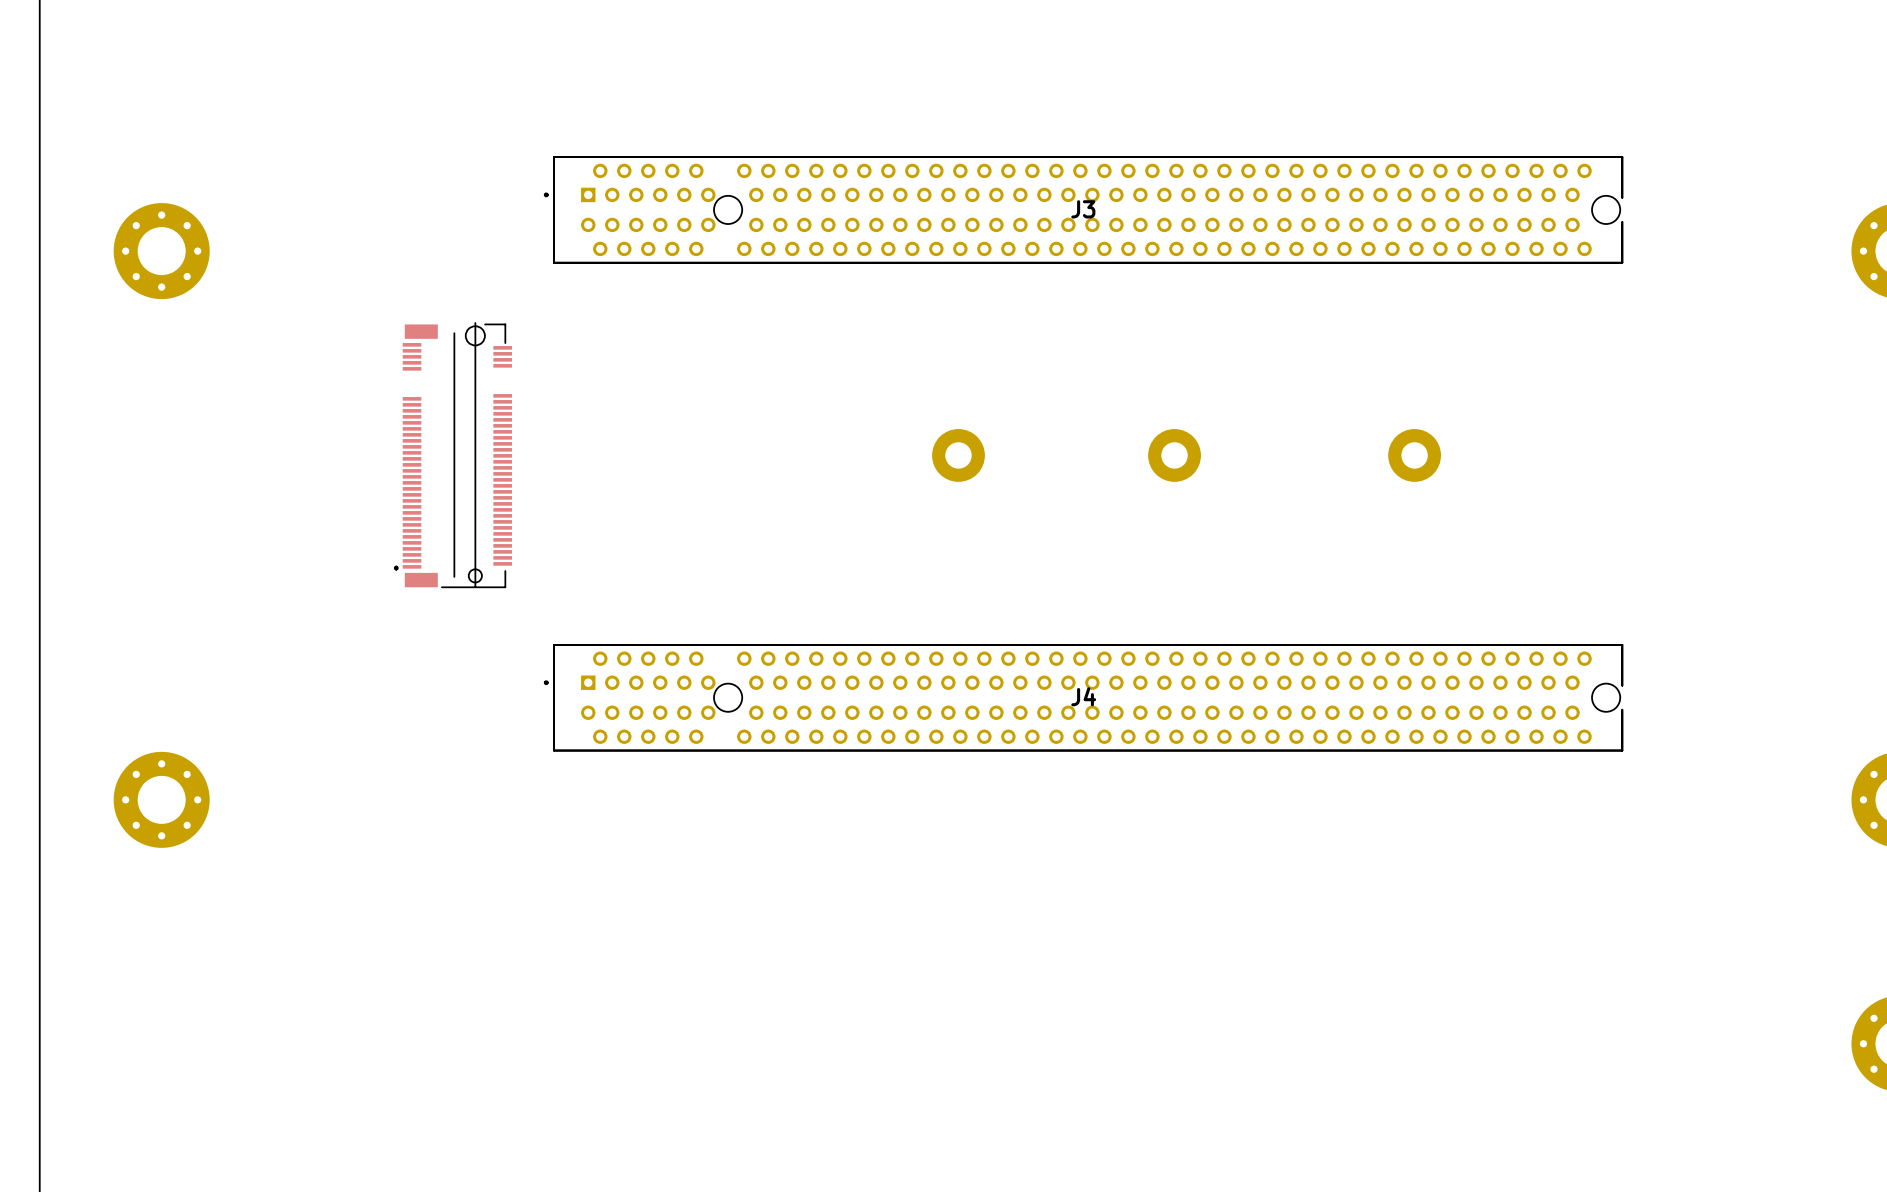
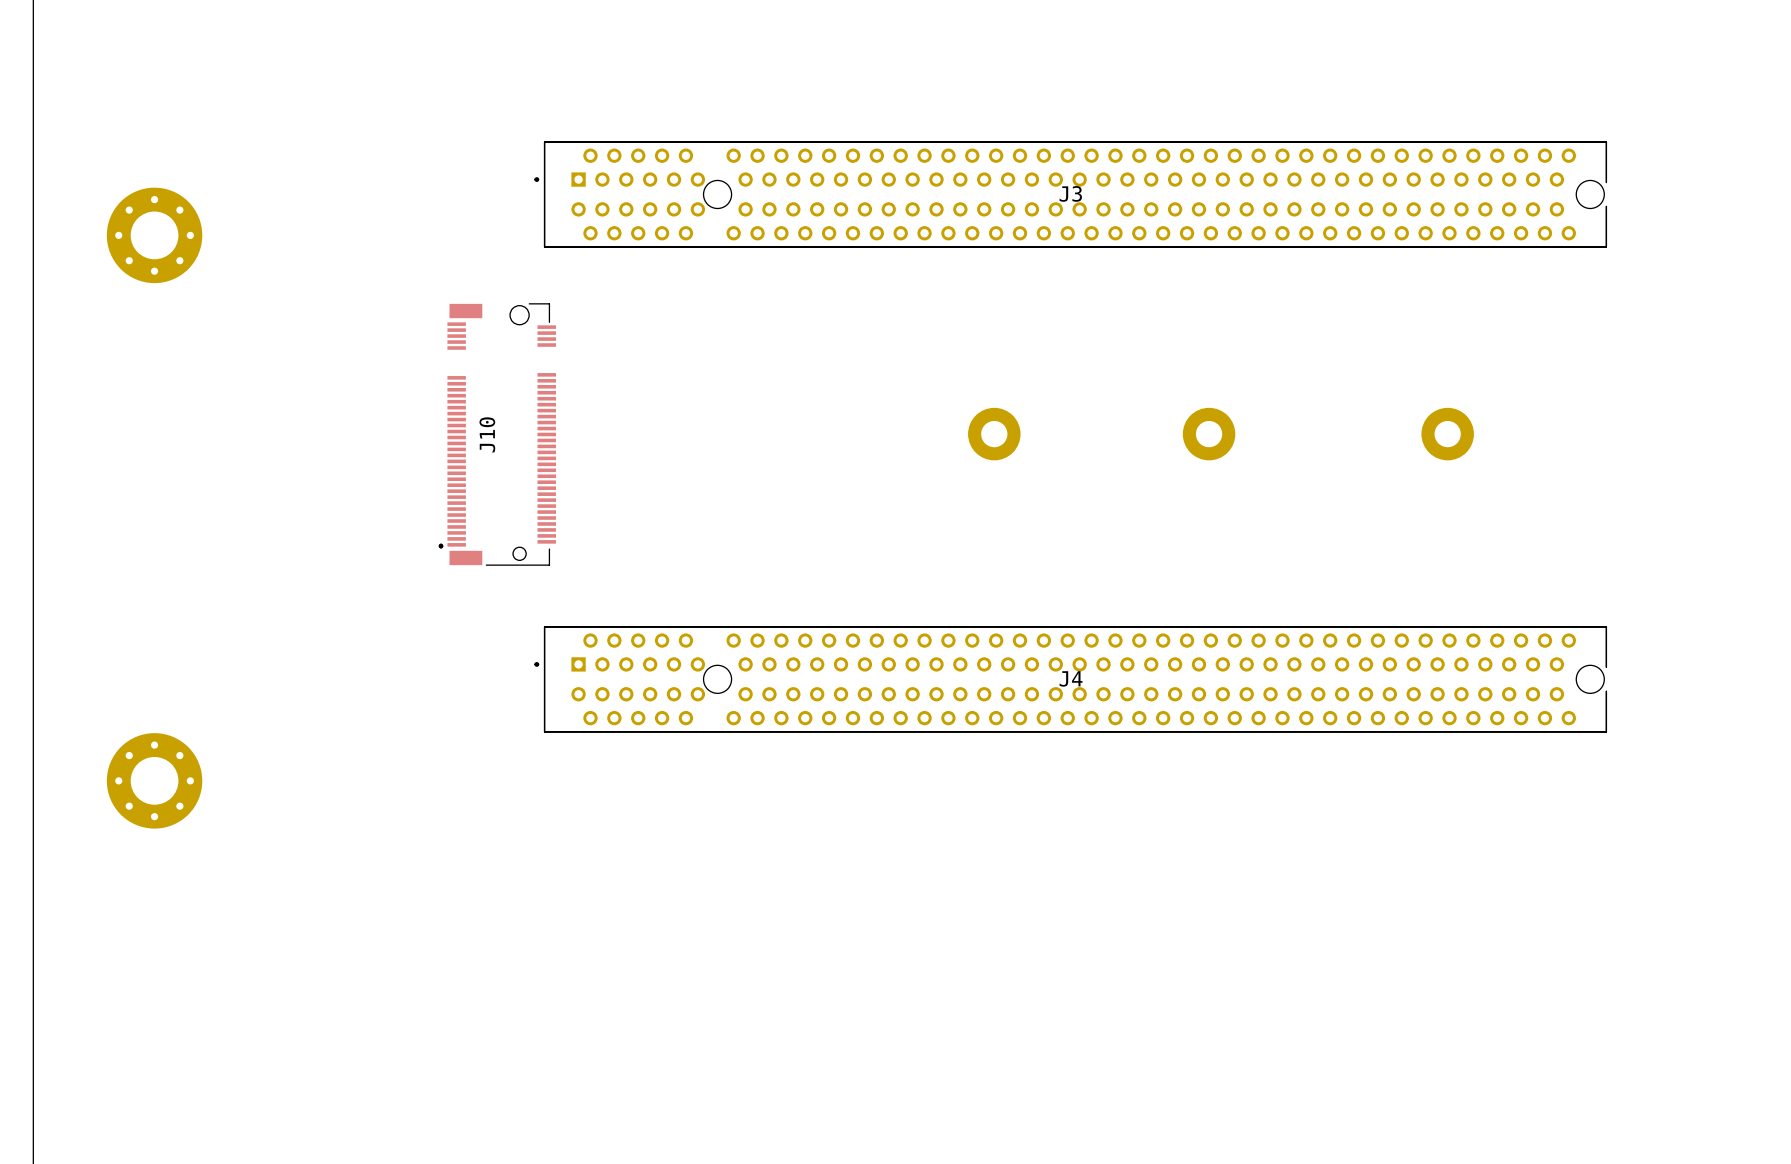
line: (475, 323) (475, 587) -> none
line: (454, 333) (454, 576) -> none
J10: none -> (497, 434)
part: (452, 455) -> none
part position: (958, 455) -> (994, 434)
part position: (1174, 455) -> (1209, 434)
part position: (1414, 455) -> (1447, 434)

